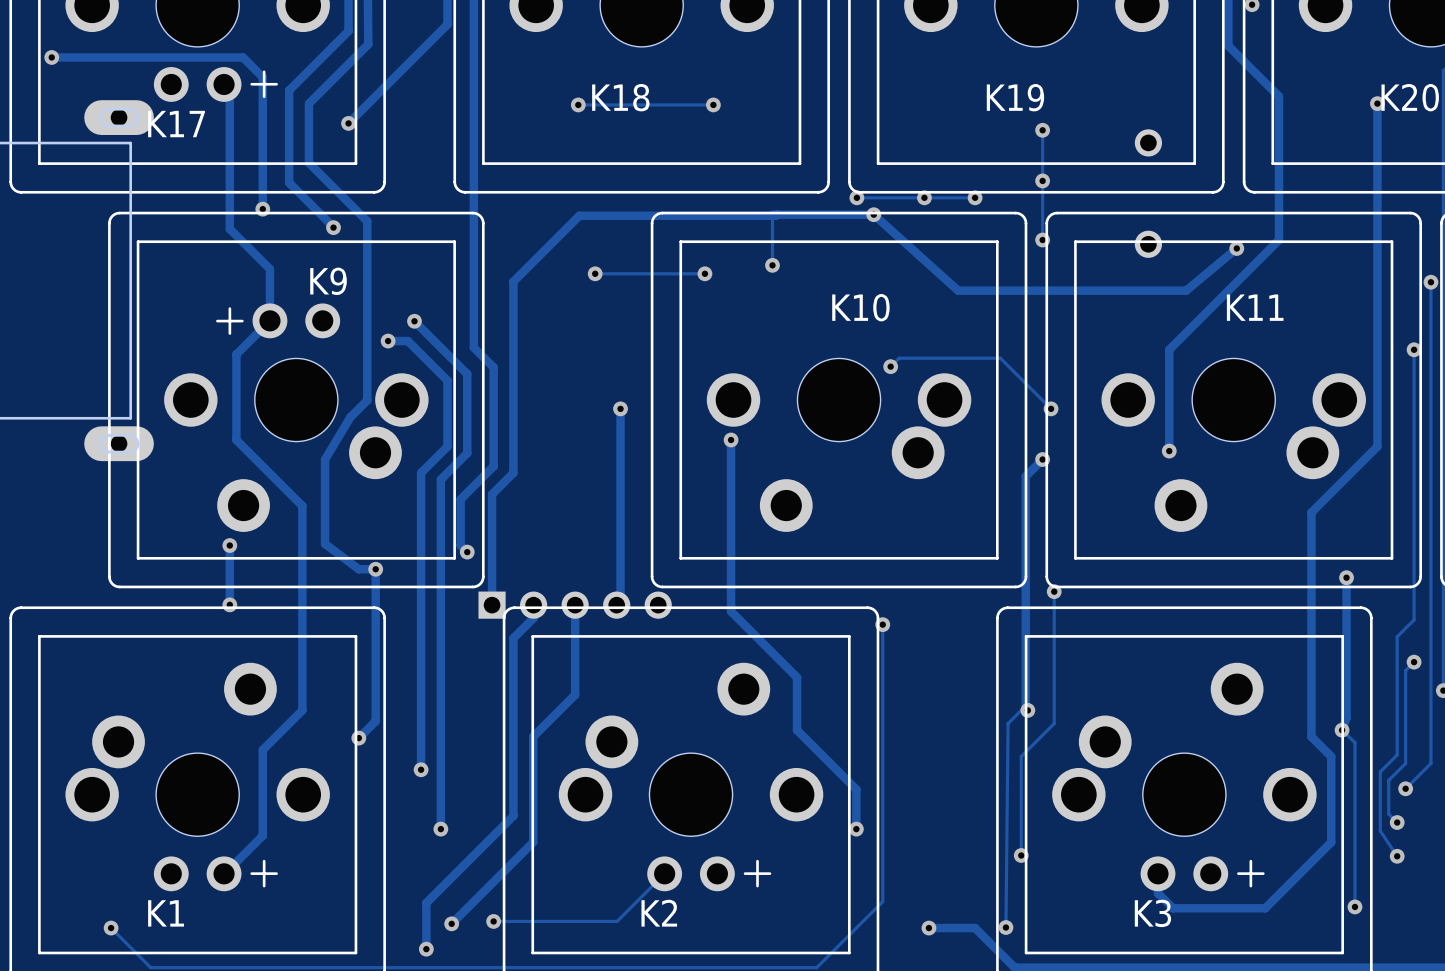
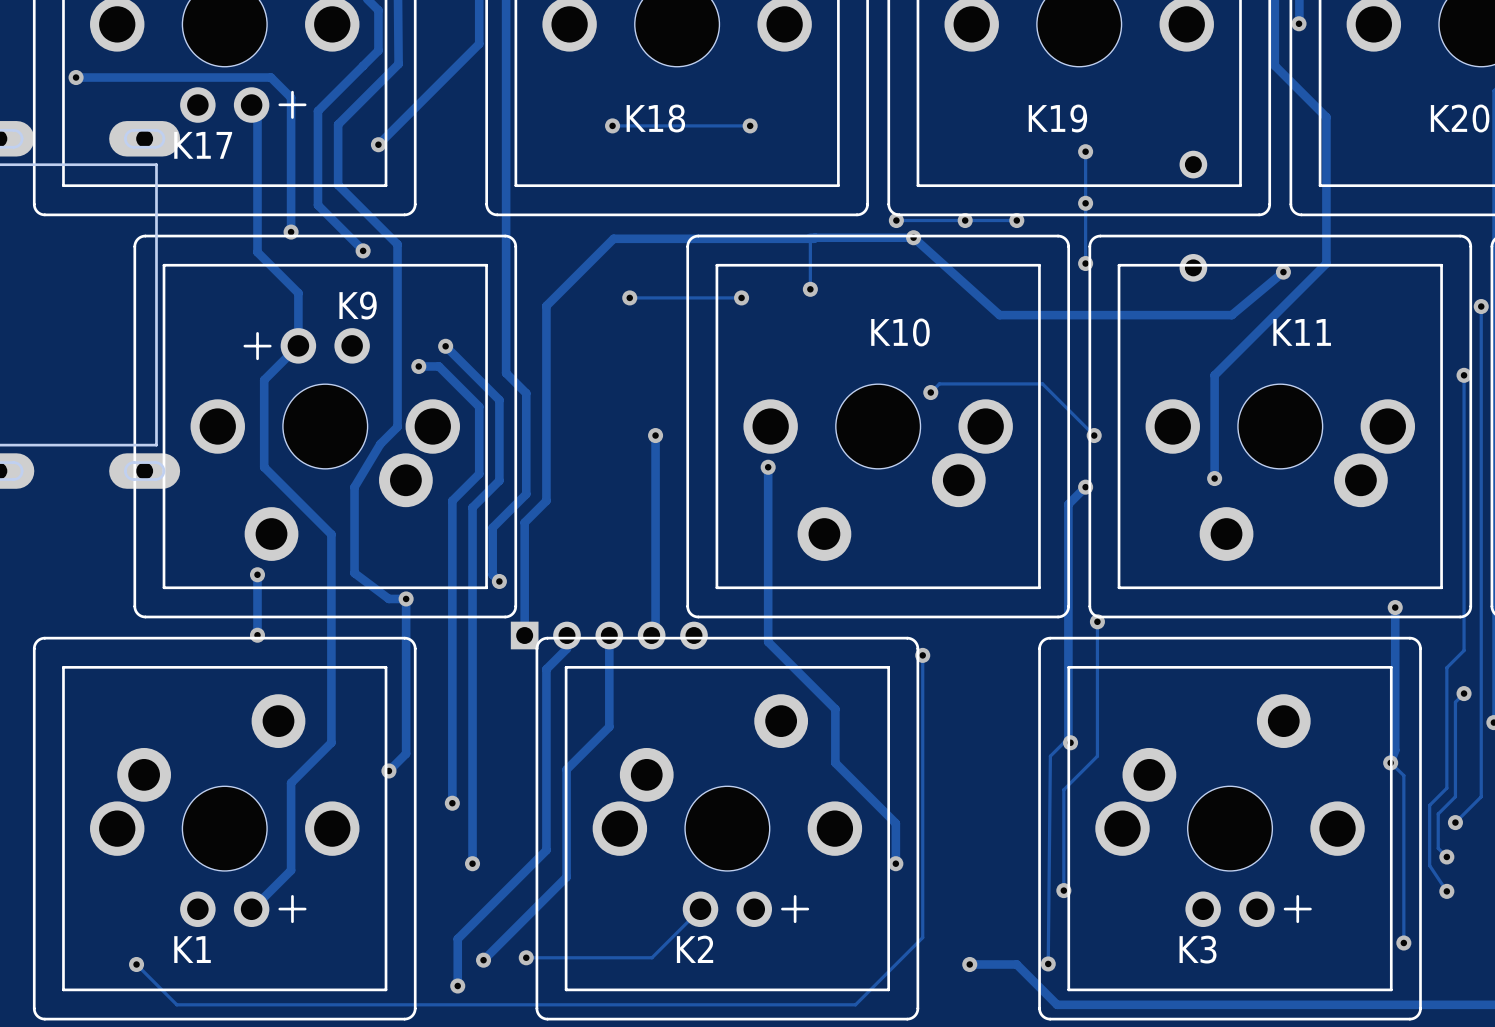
track: (1377, 103) (1377, 446) (1311, 512) (1311, 736) (1331, 756) (1331, 842) (1265, 908) (1172, 908) (1158, 893) (1158, 873) -> none
via: (1377, 103) -> none

